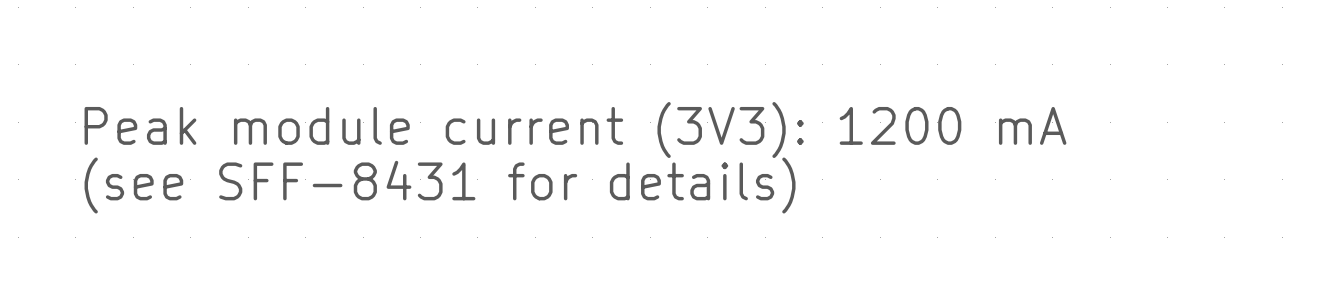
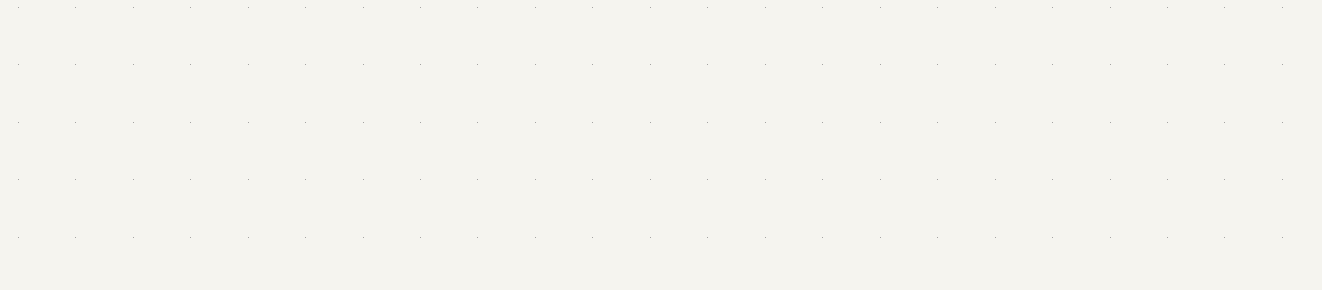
text: Peak module current (3V3): 1200 mA (575, 130) -> none
text: (see SFF-8431 for details) (440, 185) -> none

